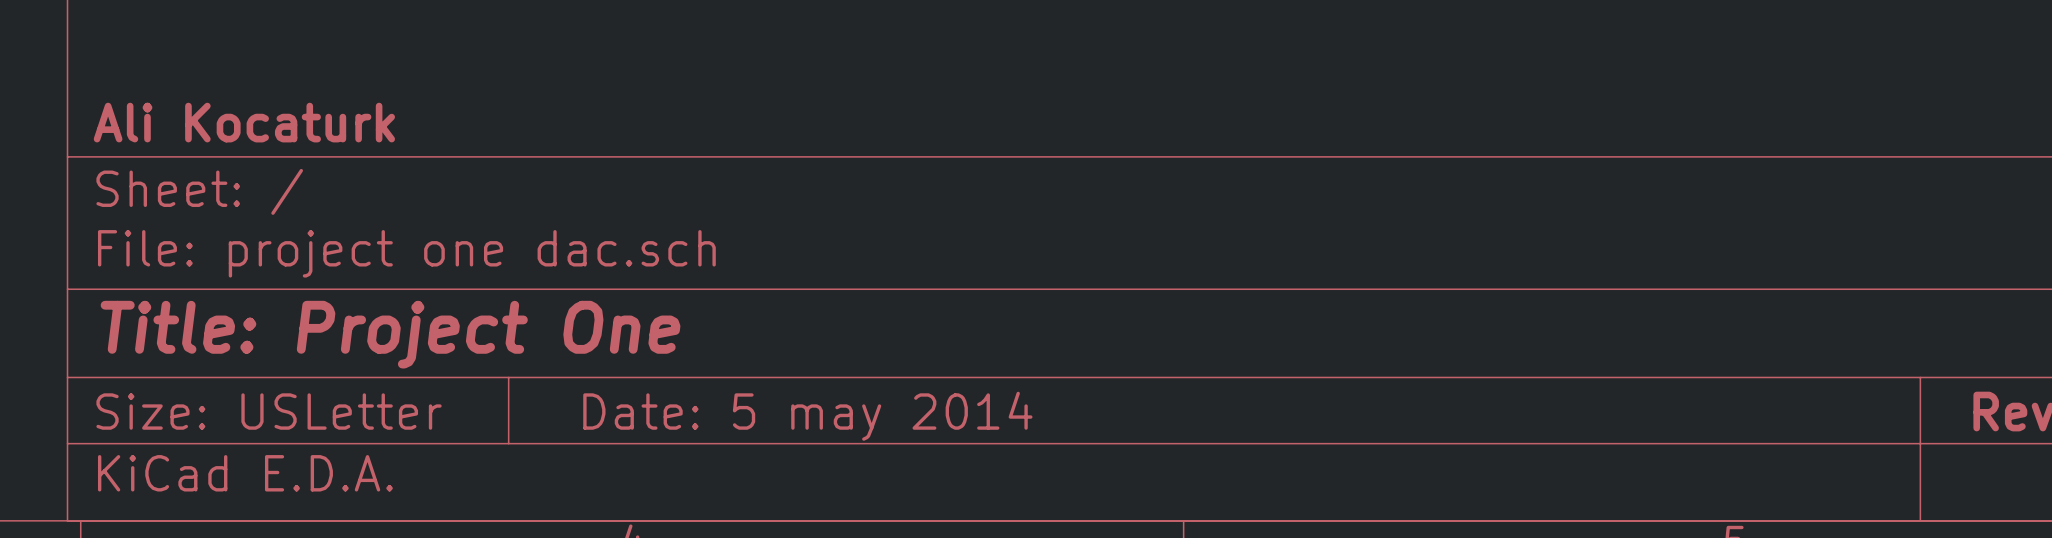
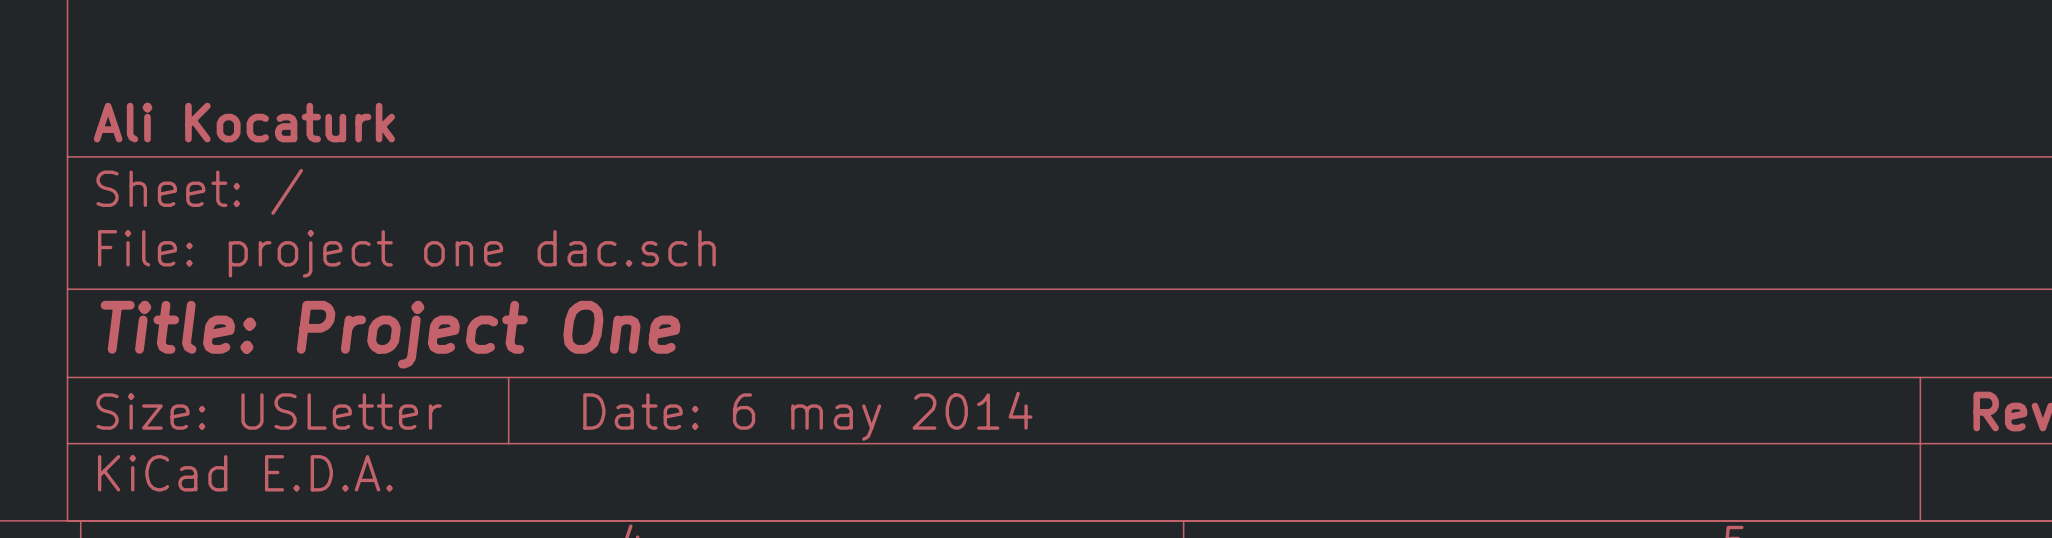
title block: Date: 5 may 2014 (807, 416) -> Date: 6 may 2014 (807, 416)

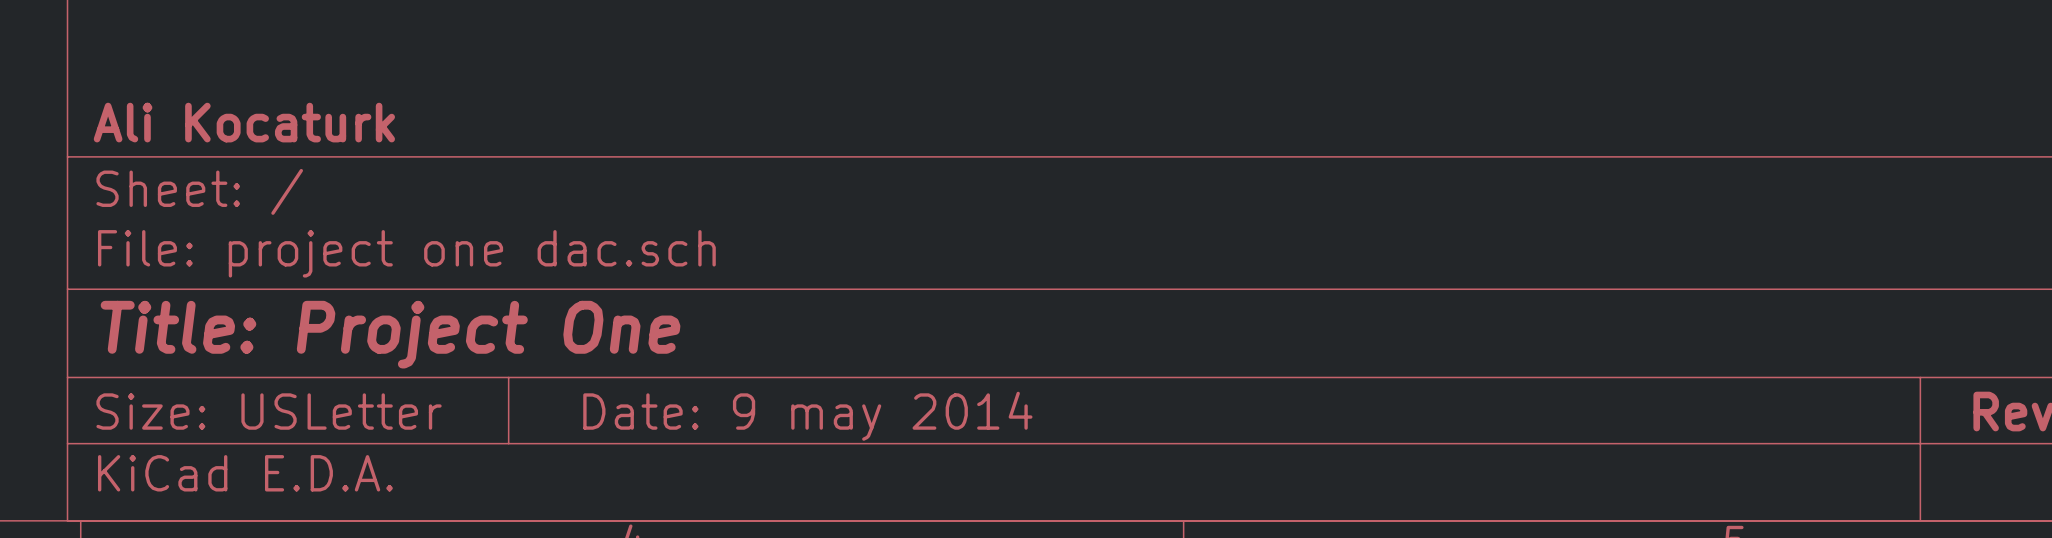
title block: Date: 6 may 2014 (807, 416) -> Date: 9 may 2014 (807, 416)

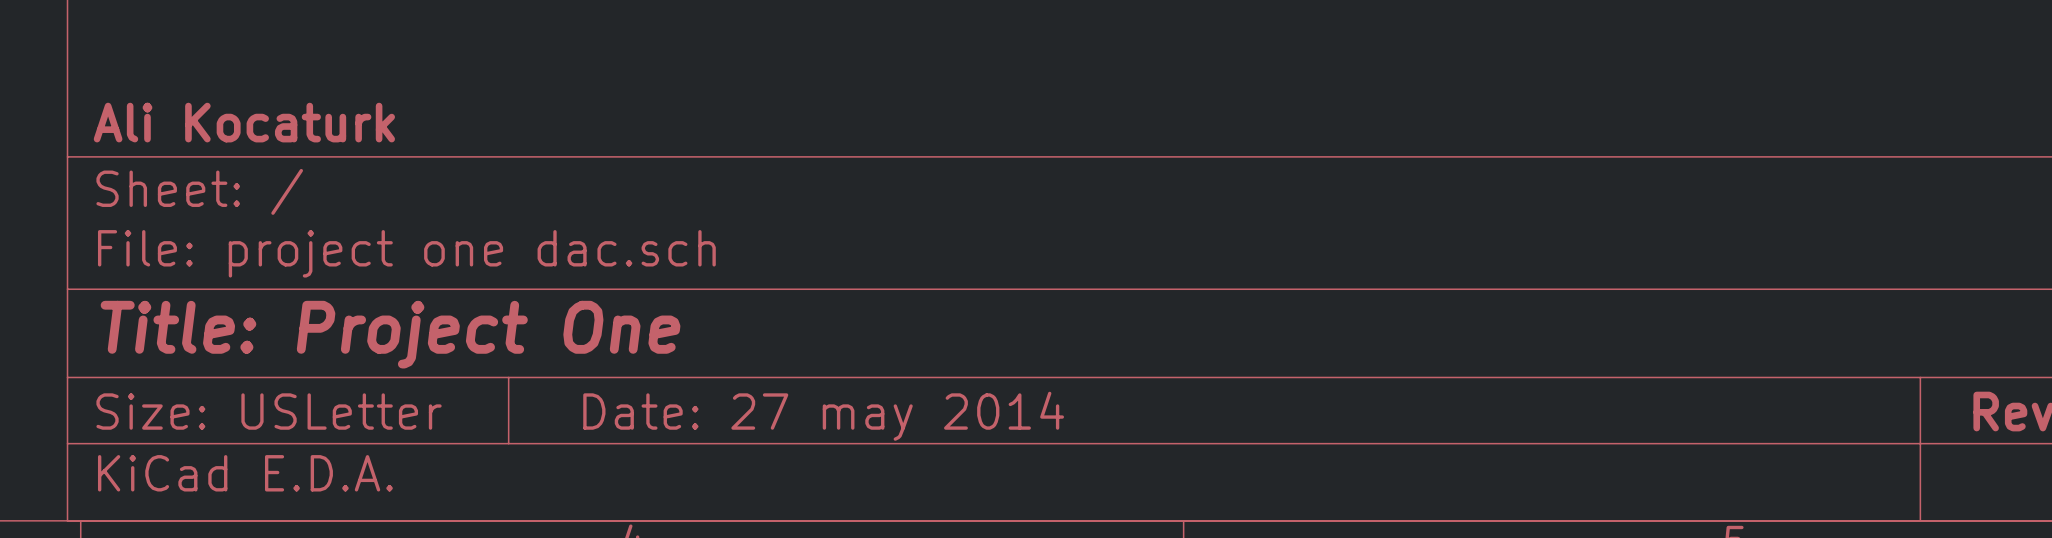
title block: Date: 9 may 2014 (807, 416) -> Date: 27 may 2014 (823, 416)

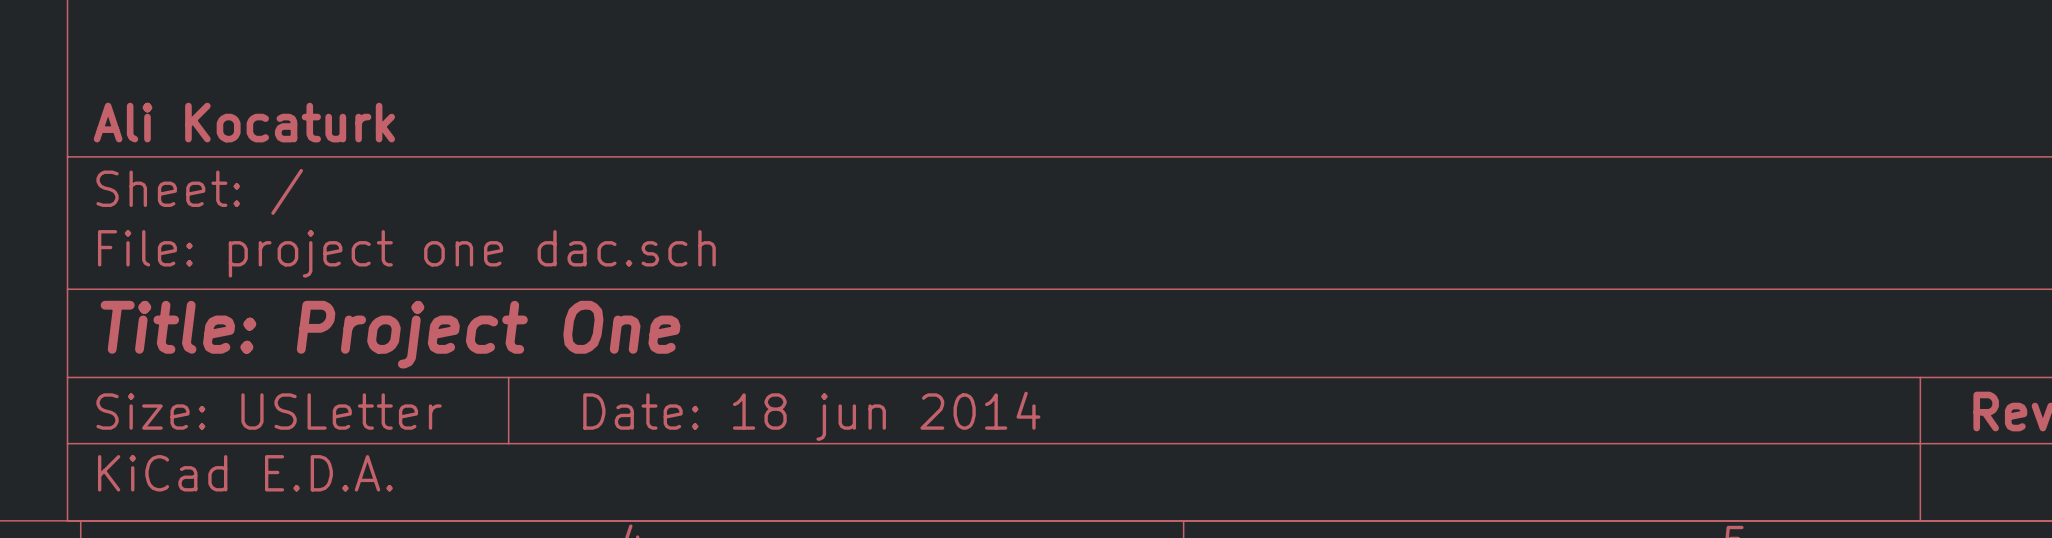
title block: Date: 27 may 2014 (823, 416) -> Date: 18 jun 2014 (811, 416)

